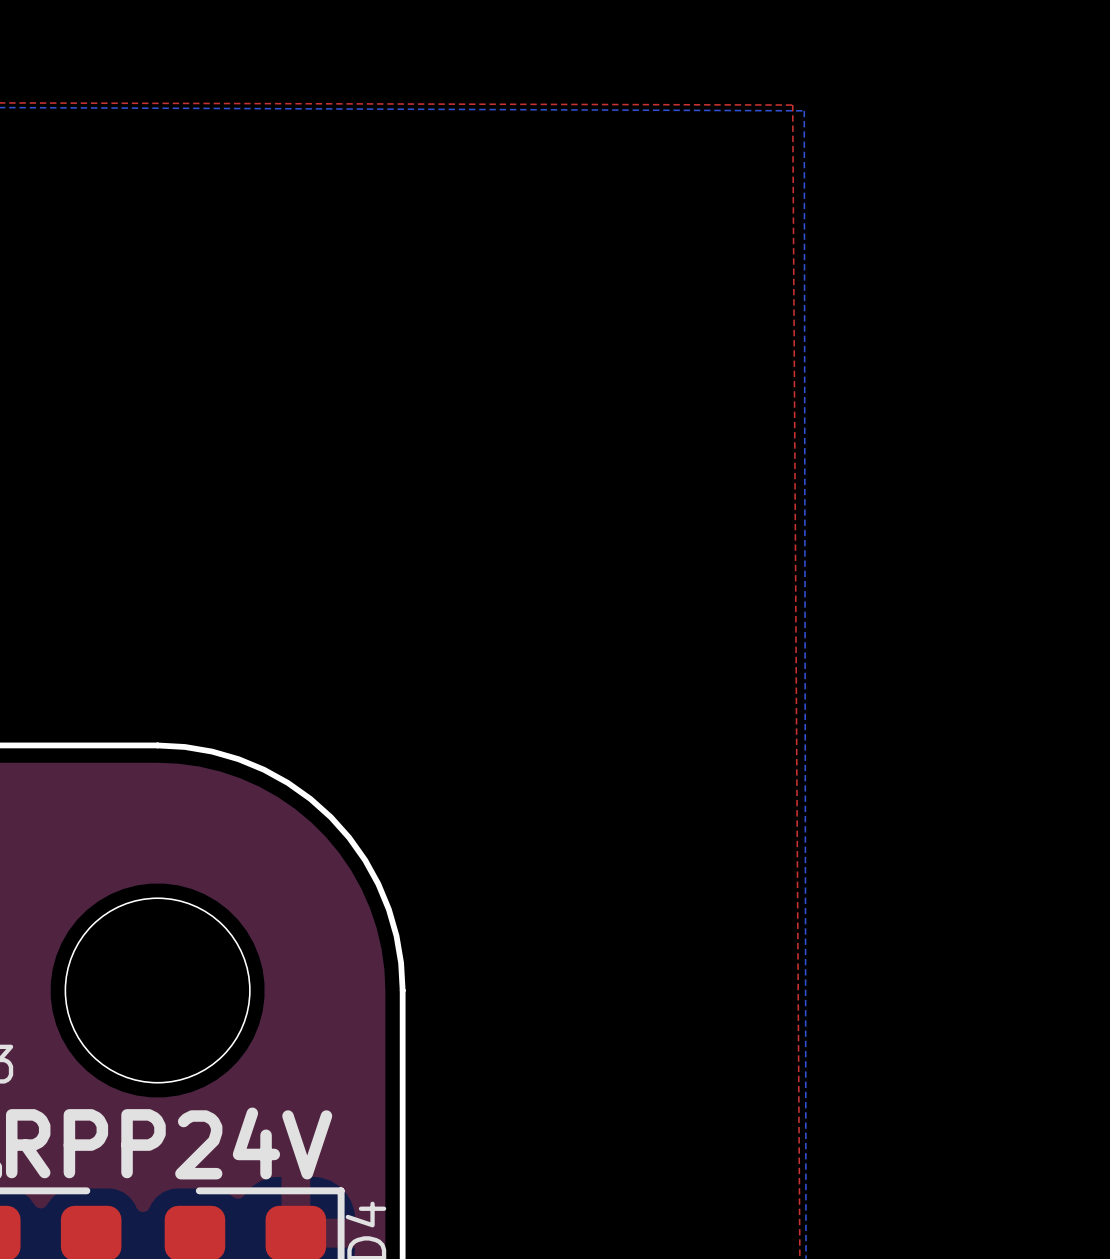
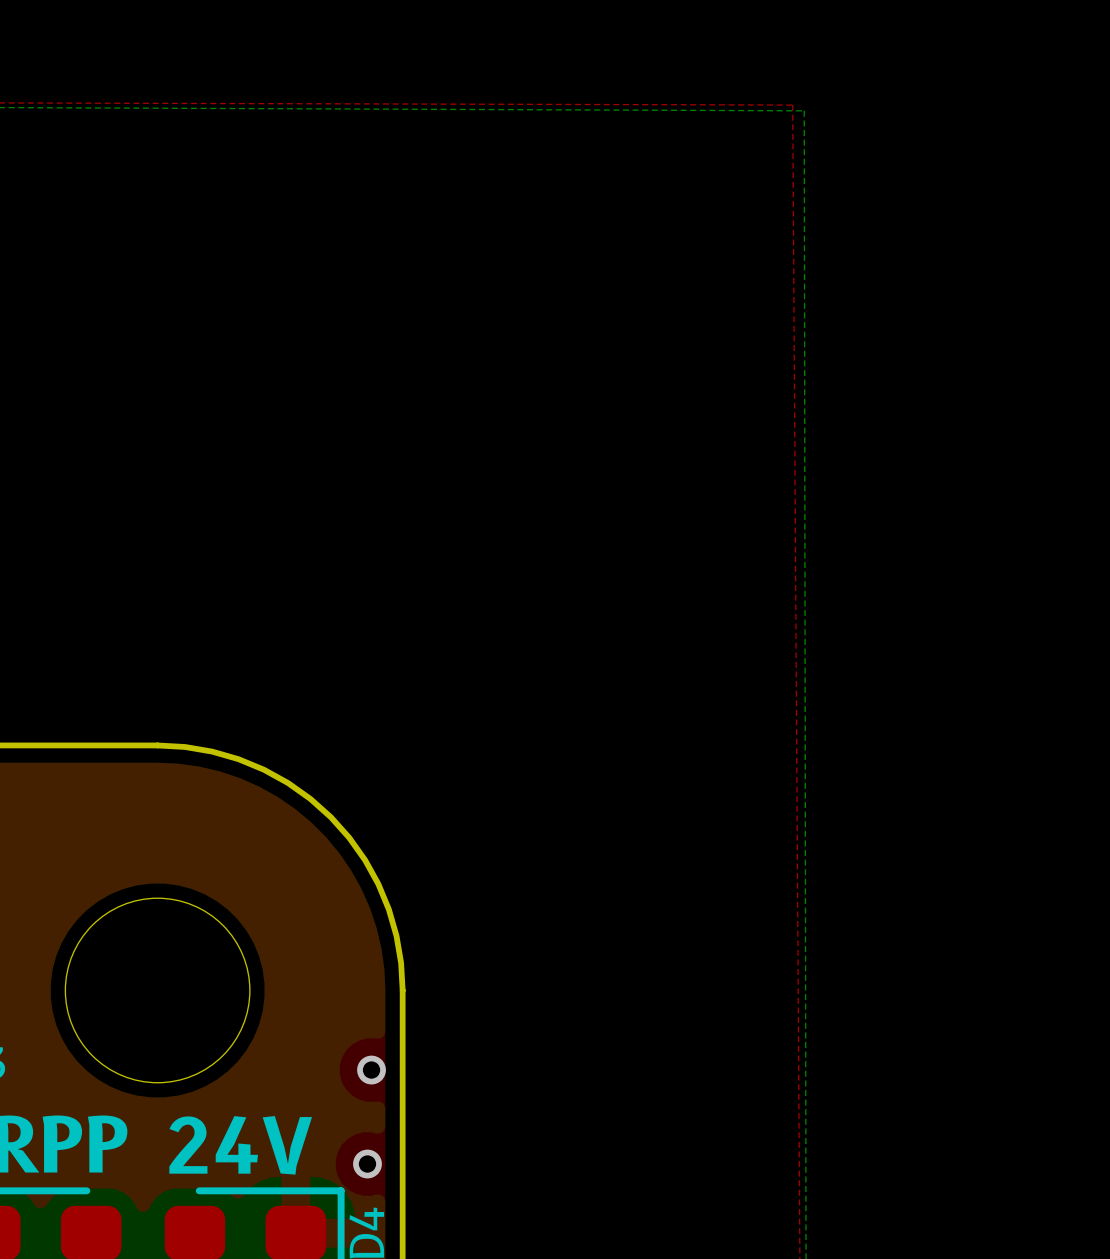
via: none -> (371, 1070)
via: none -> (367, 1164)

